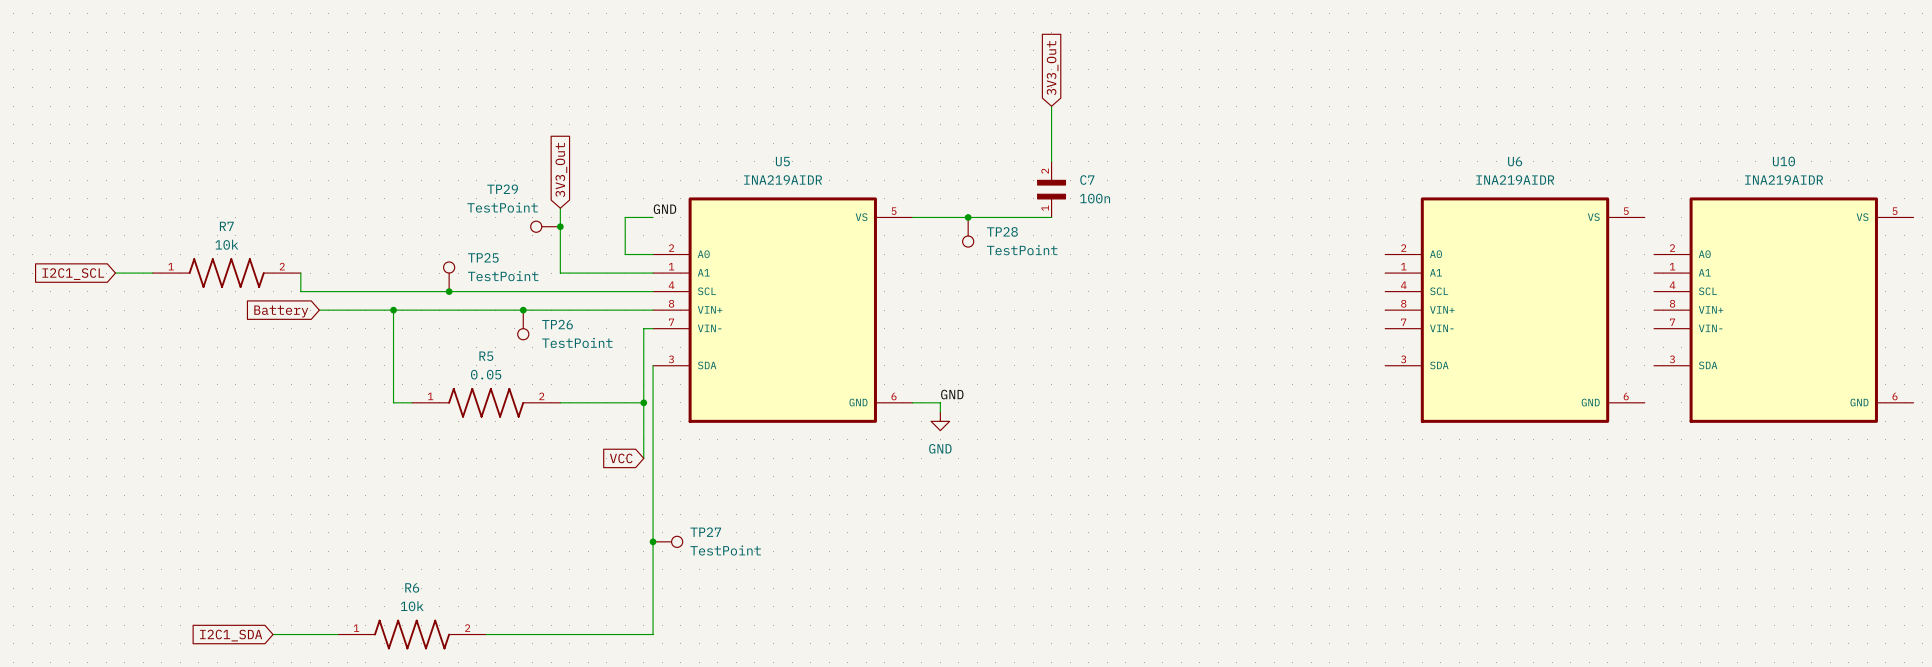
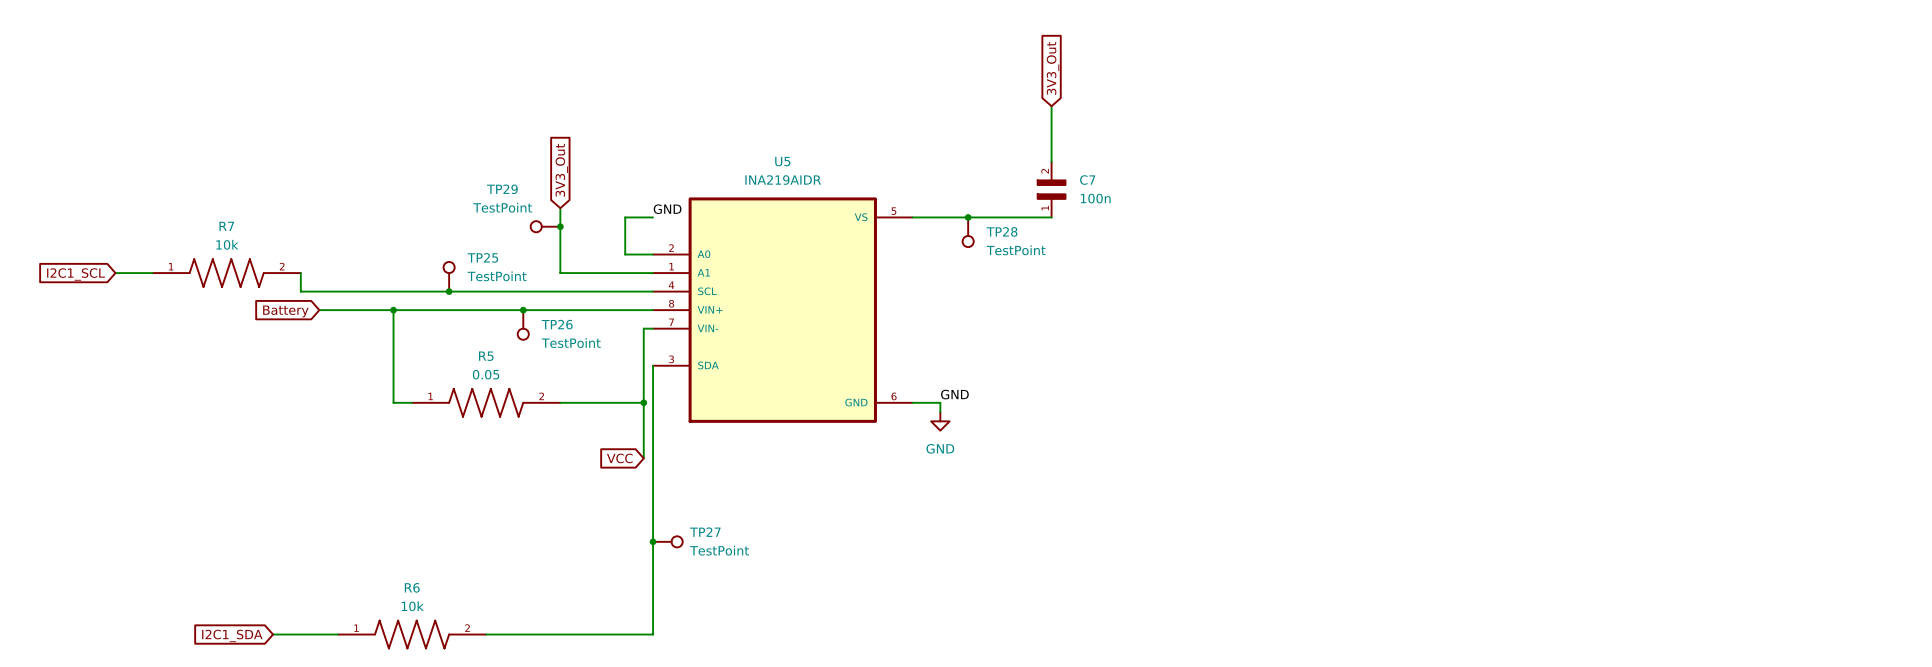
U6: INA219AIDR (1514, 310) -> none
U10: INA219AIDR (1783, 310) -> none

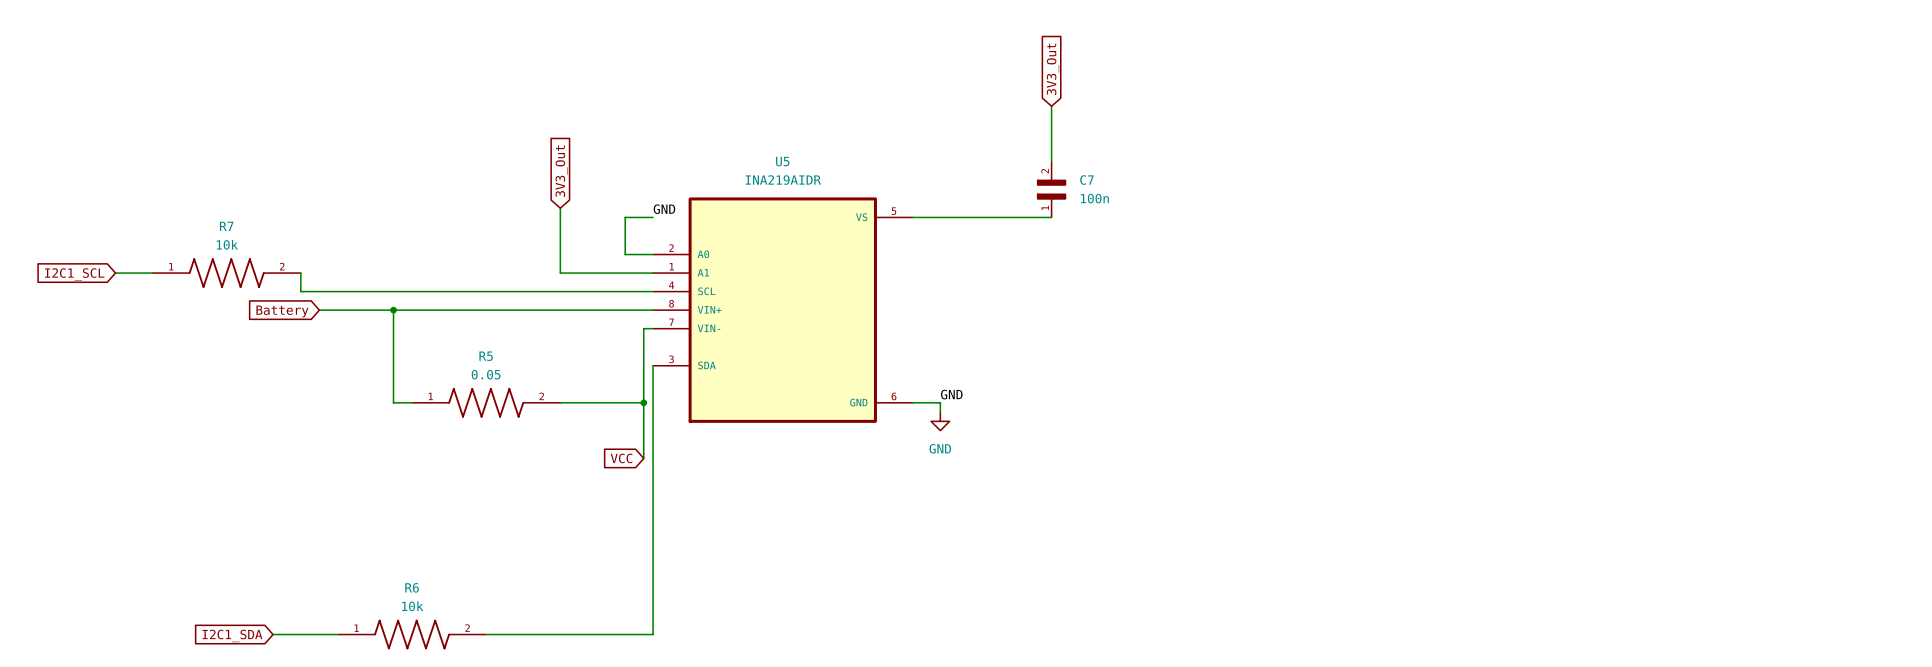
junction: (968, 217) -> none
TP29: TestPoint (545, 226) -> none
junction: (560, 226) -> none
TP28: TestPoint (968, 232) -> none
TP25: TestPoint (449, 276) -> none
junction: (449, 291) -> none
junction: (523, 310) -> none
TP26: TestPoint (523, 324) -> none
junction: (653, 541) -> none
TP27: TestPoint (667, 541) -> none

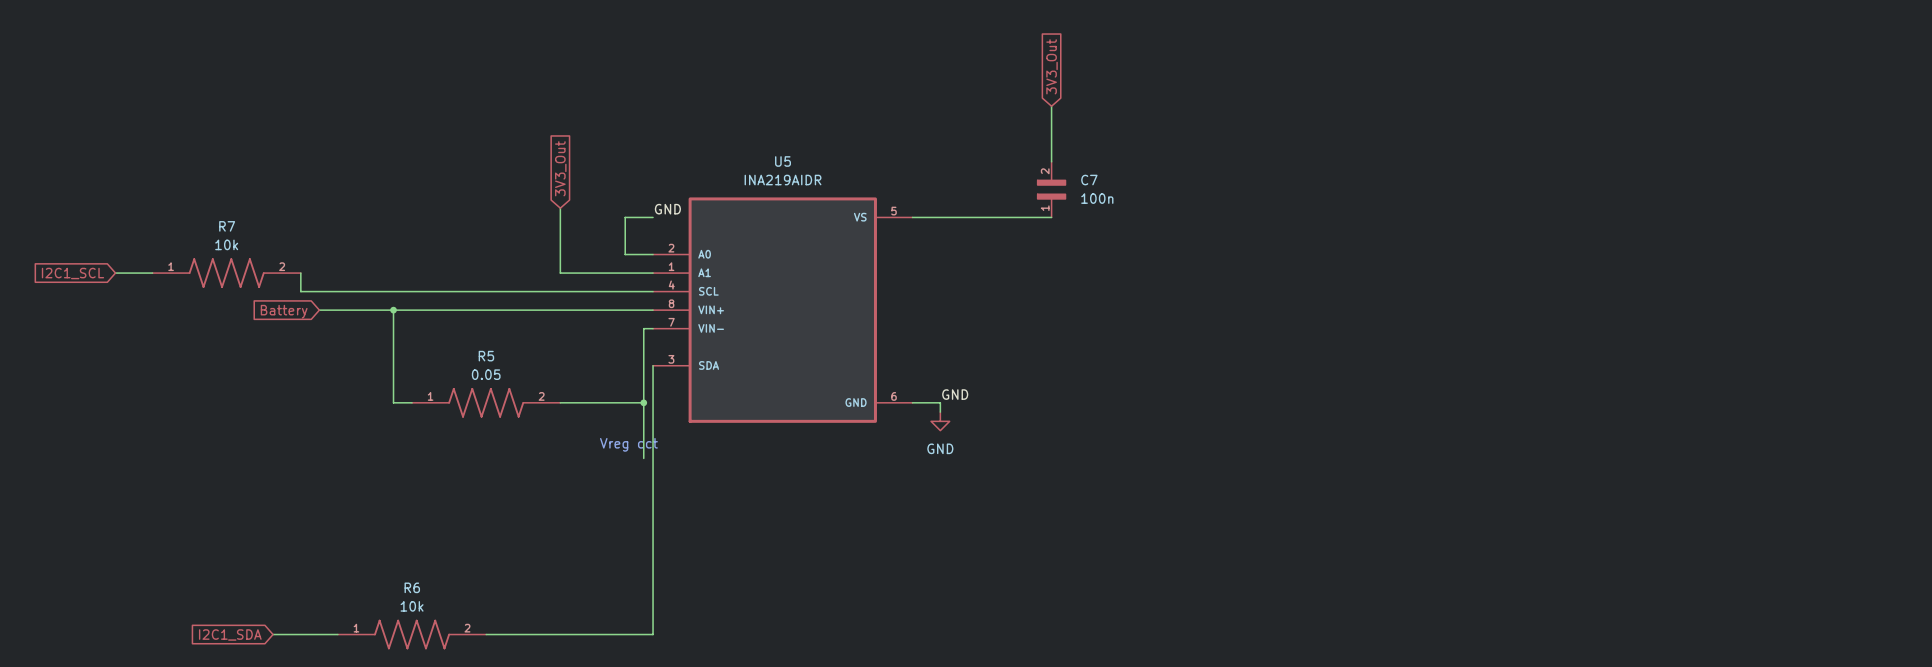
text: none -> Vreg cct (628, 444)
global label: VCC (621, 458) -> none

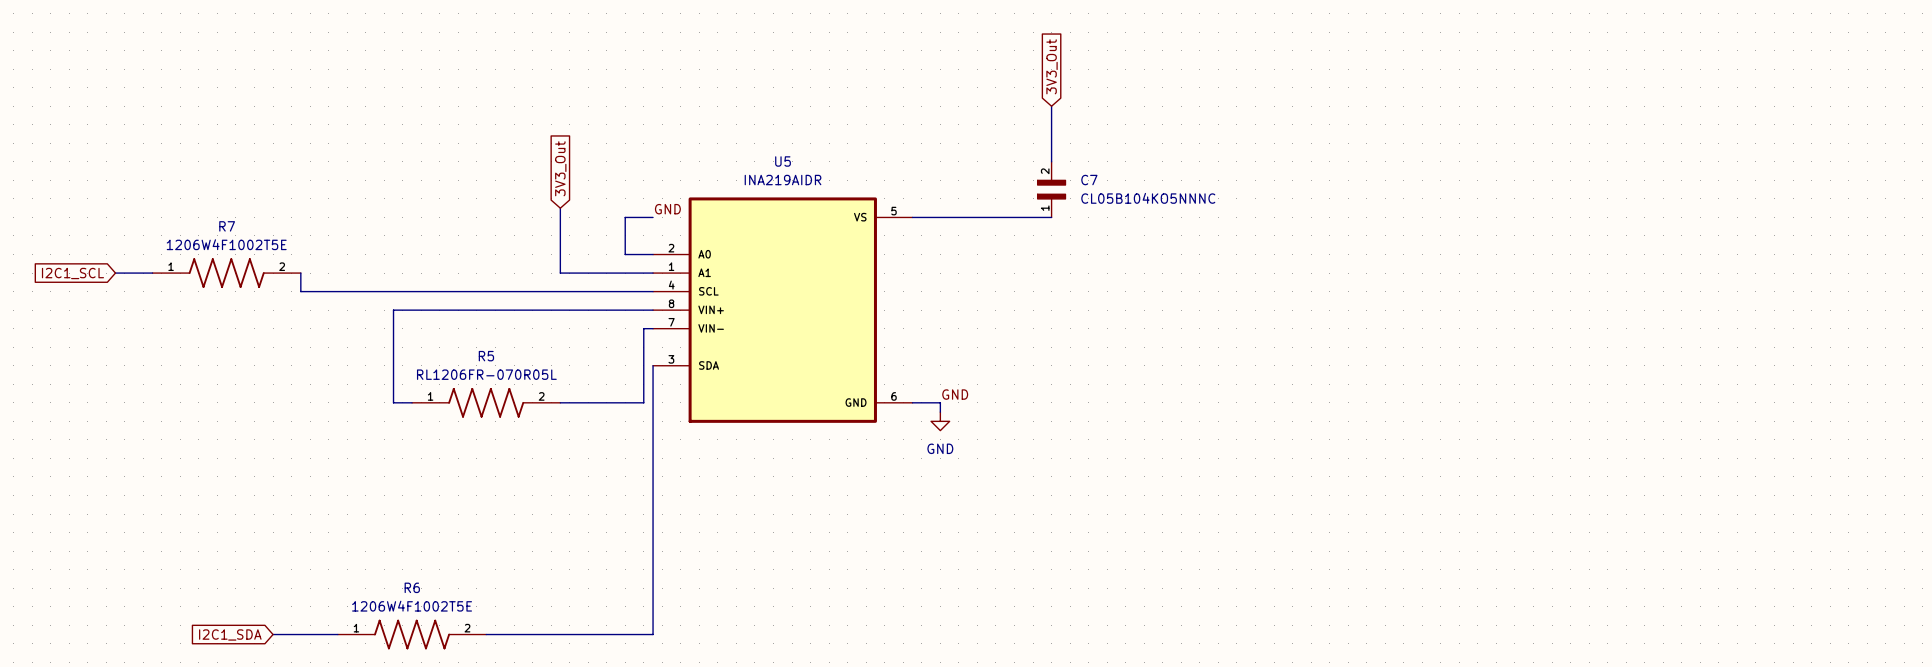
C7 value: 100n (1097, 198) -> CL05B104KO5NNNC (1148, 198)
R7 value: 10k (226, 244) -> 1206W4F1002T5E (226, 244)
wire: (319, 310) (393, 310) -> none
junction: (393, 310) -> none
global label: Battery (284, 311) -> none
R5 value: 0.05 (486, 374) -> RL1206FR-070R05L (486, 374)
wire: (643, 402) (643, 458) -> none
junction: (643, 402) -> none
text: Vreg cct (628, 444) -> none
R6 value: 10k (412, 606) -> 1206W4F1002T5E (412, 606)

